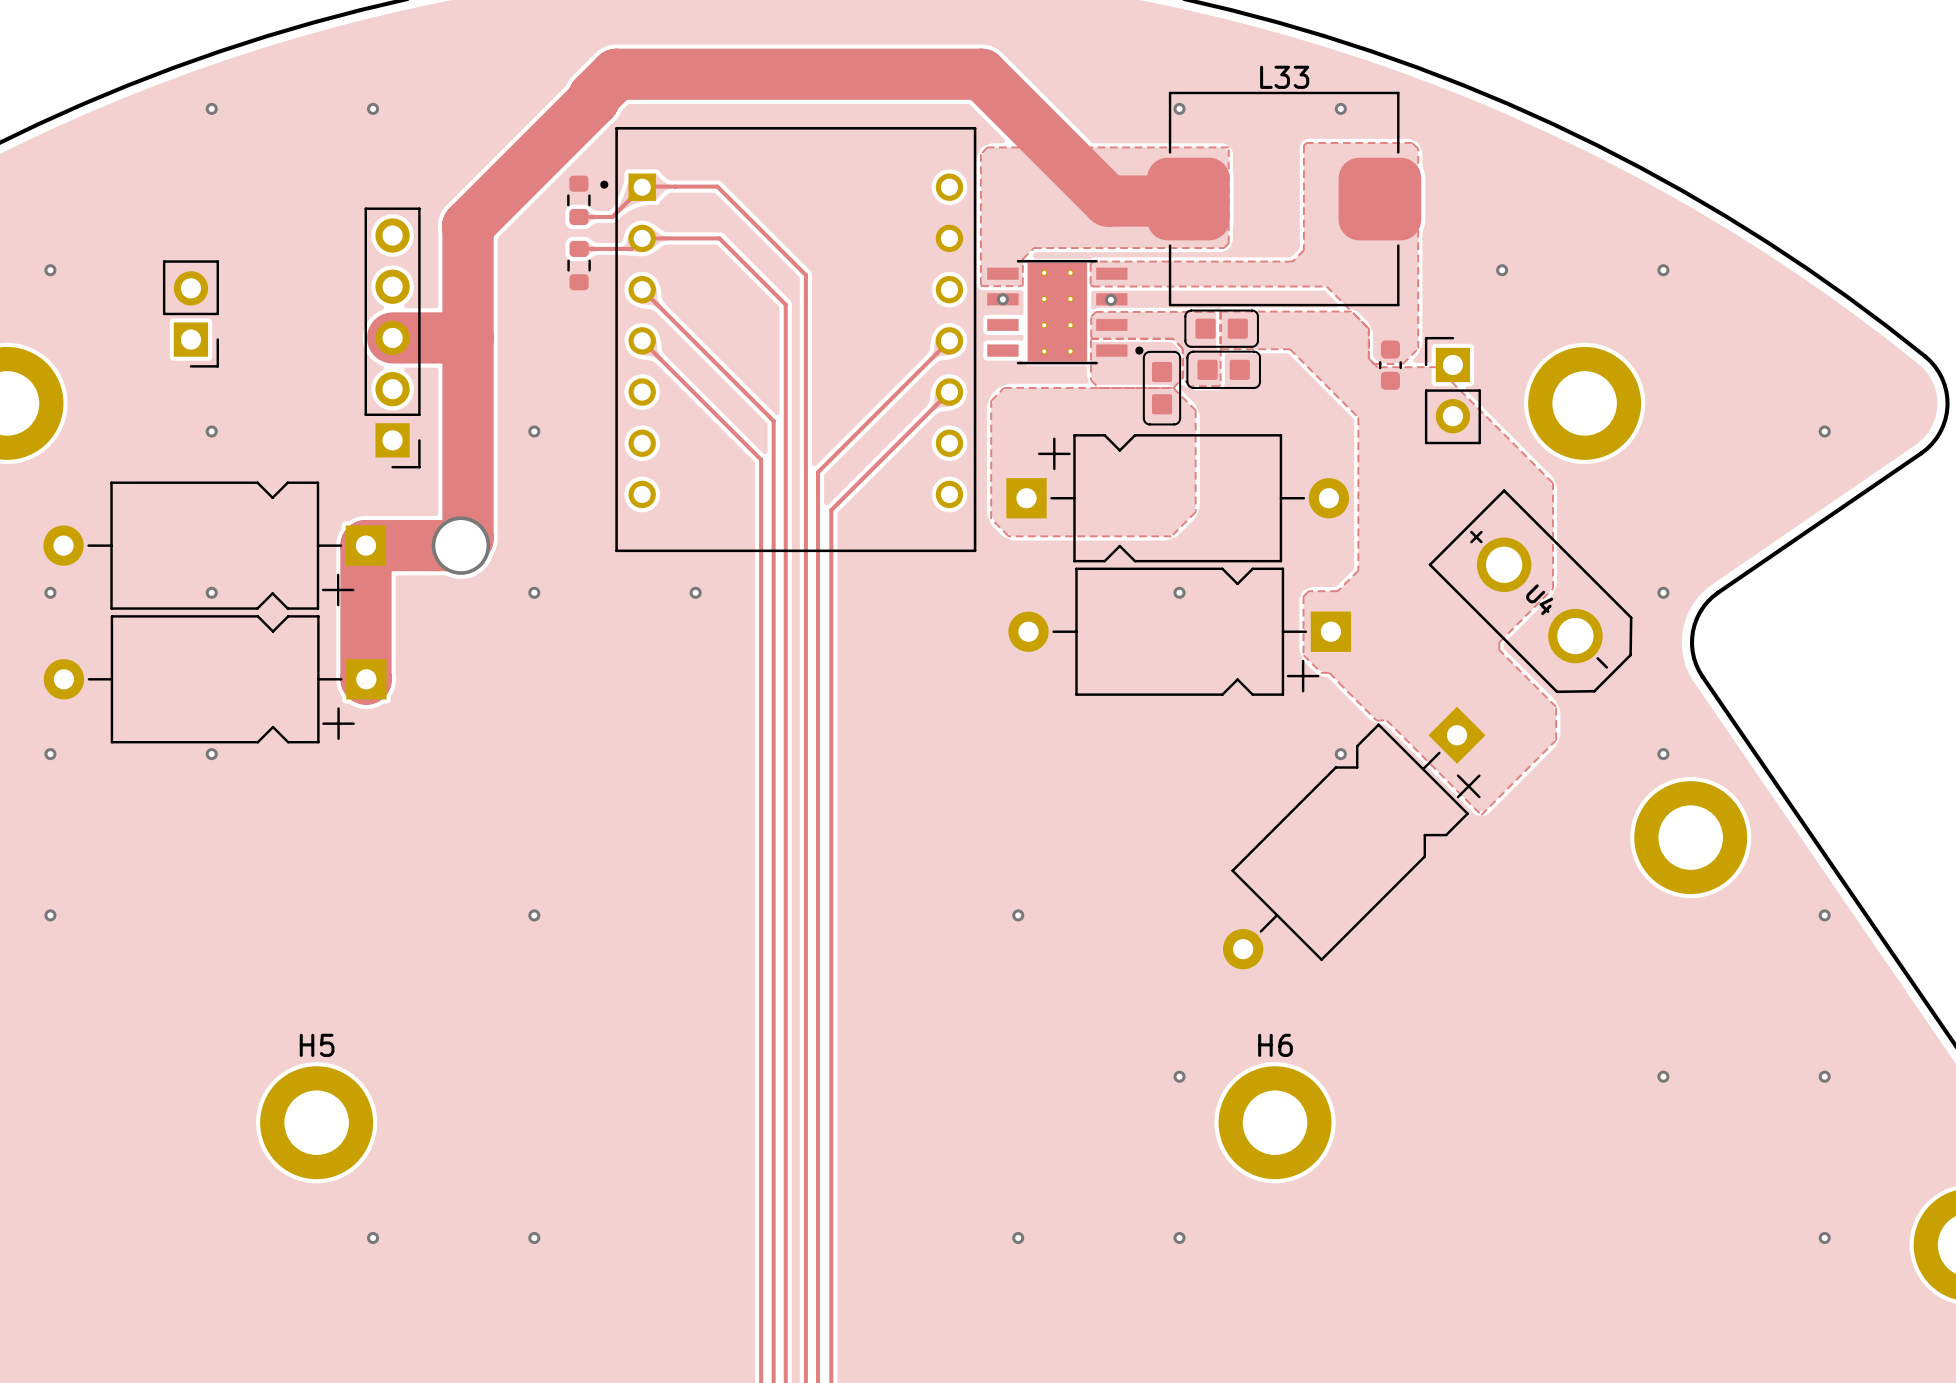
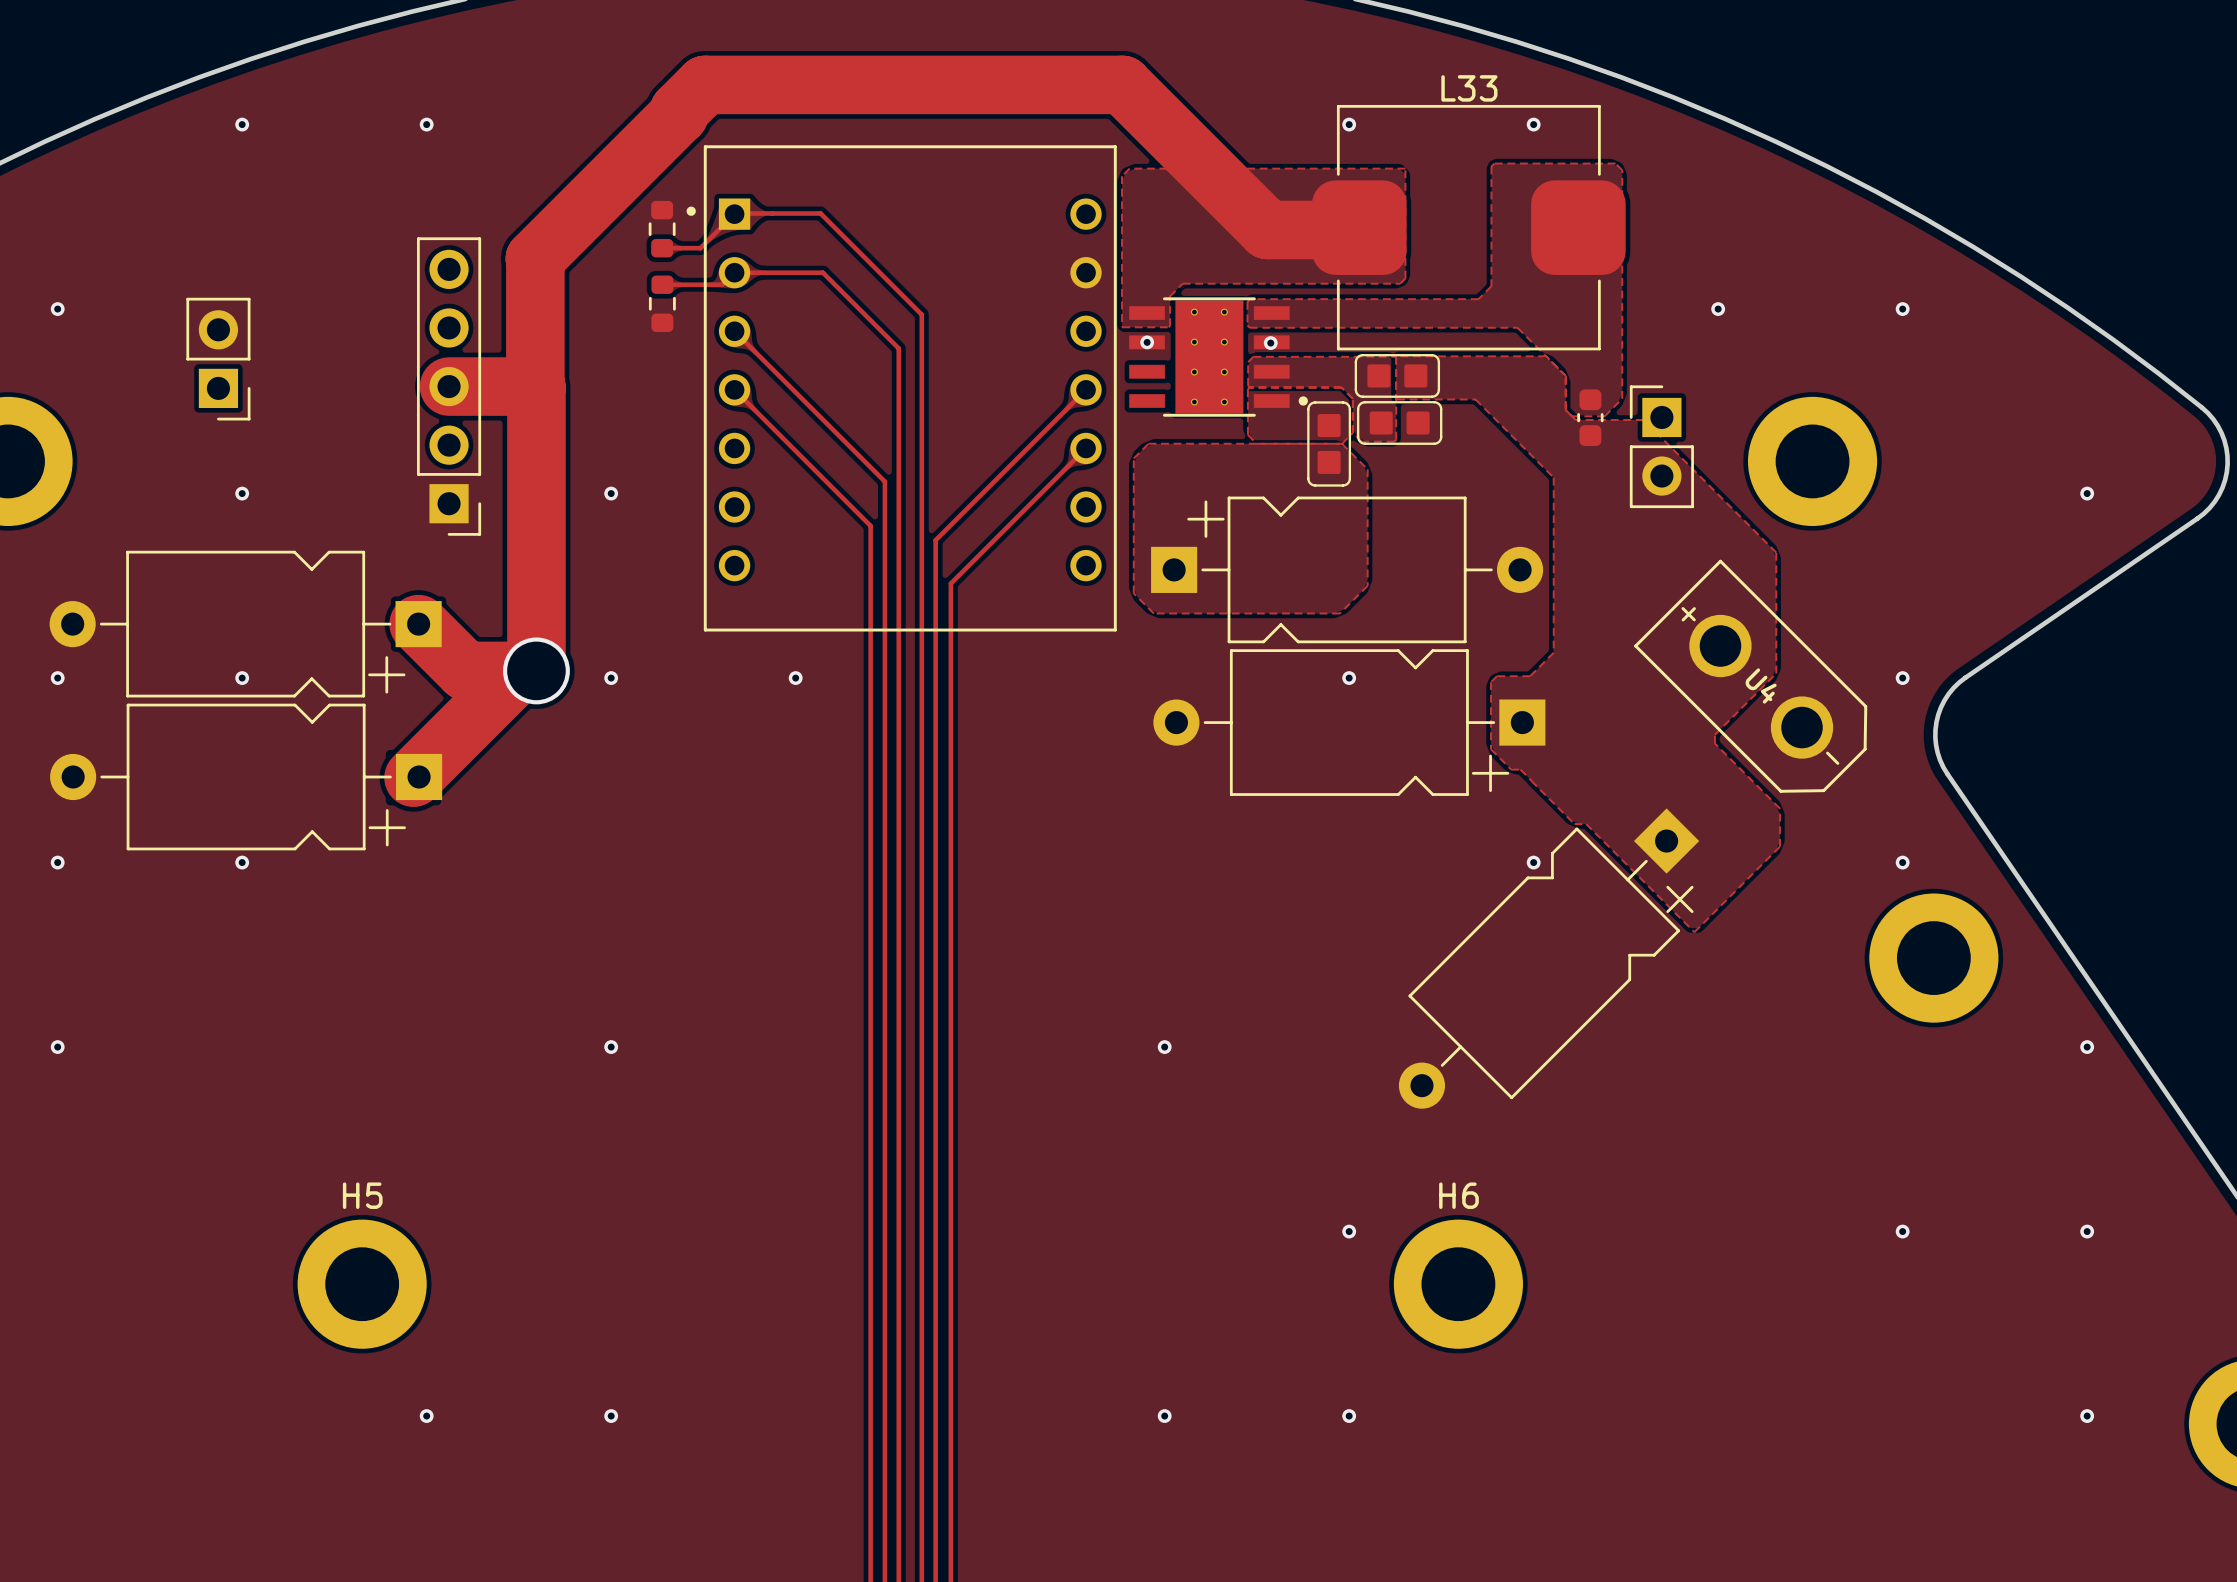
track: (468, 337) (468, 538) (460, 545) (365, 545) (366, 679) -> (535, 386) (536, 670) (465, 670) (418, 624)
via position: (460, 545) -> (536, 670)
track: none -> (520, 670) (413, 777)

